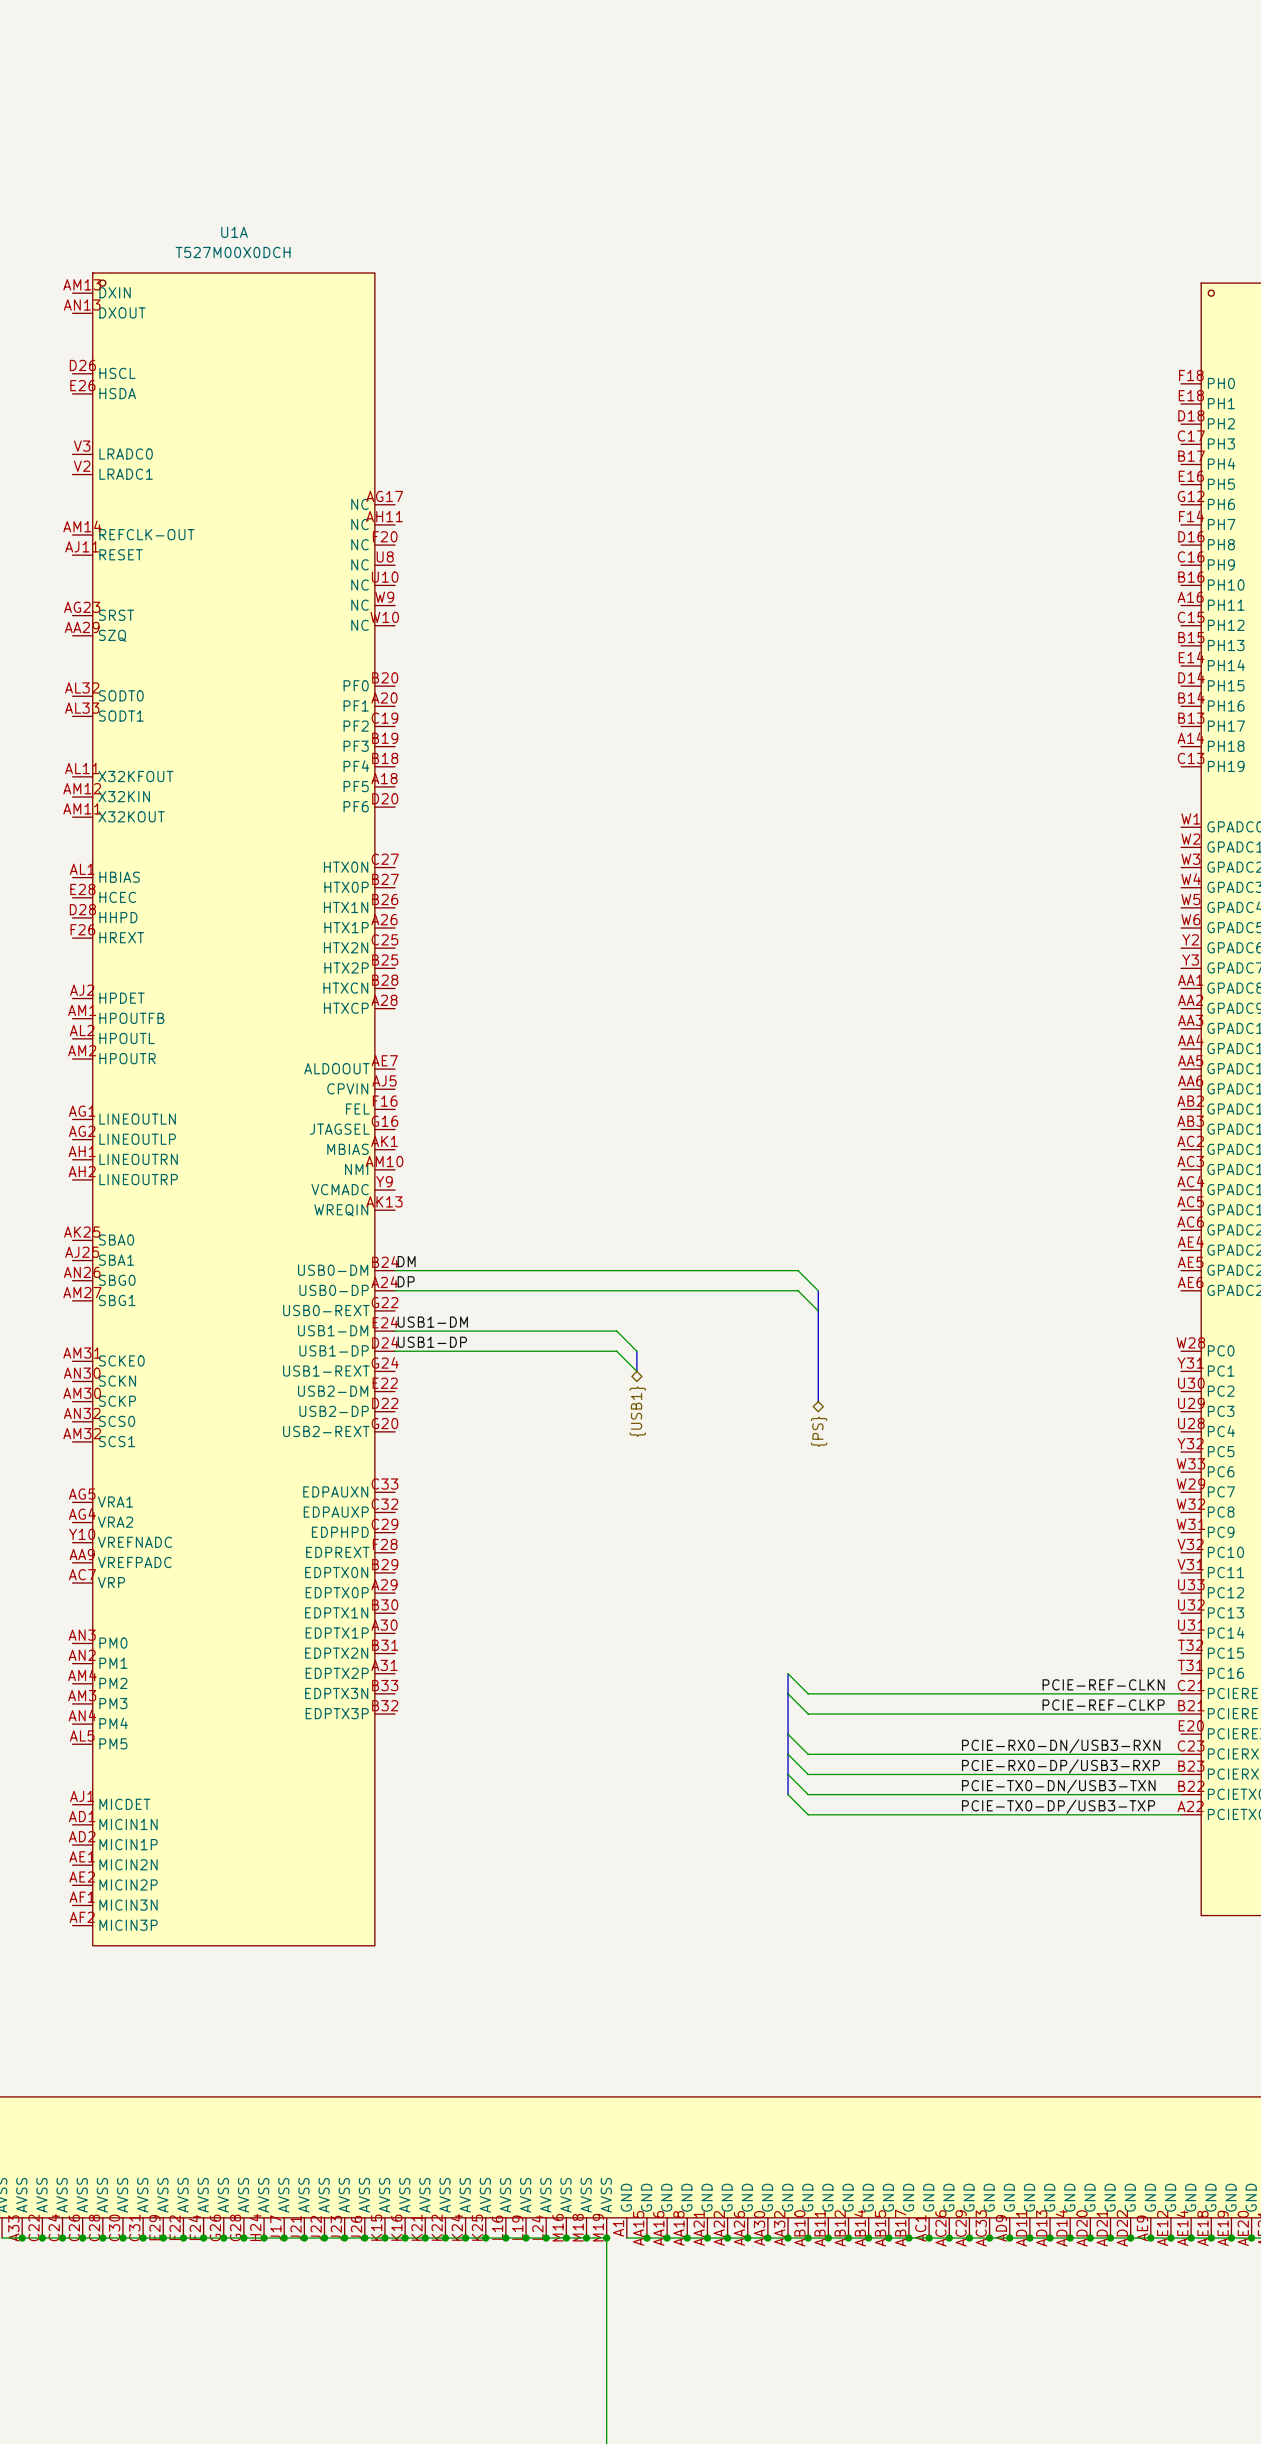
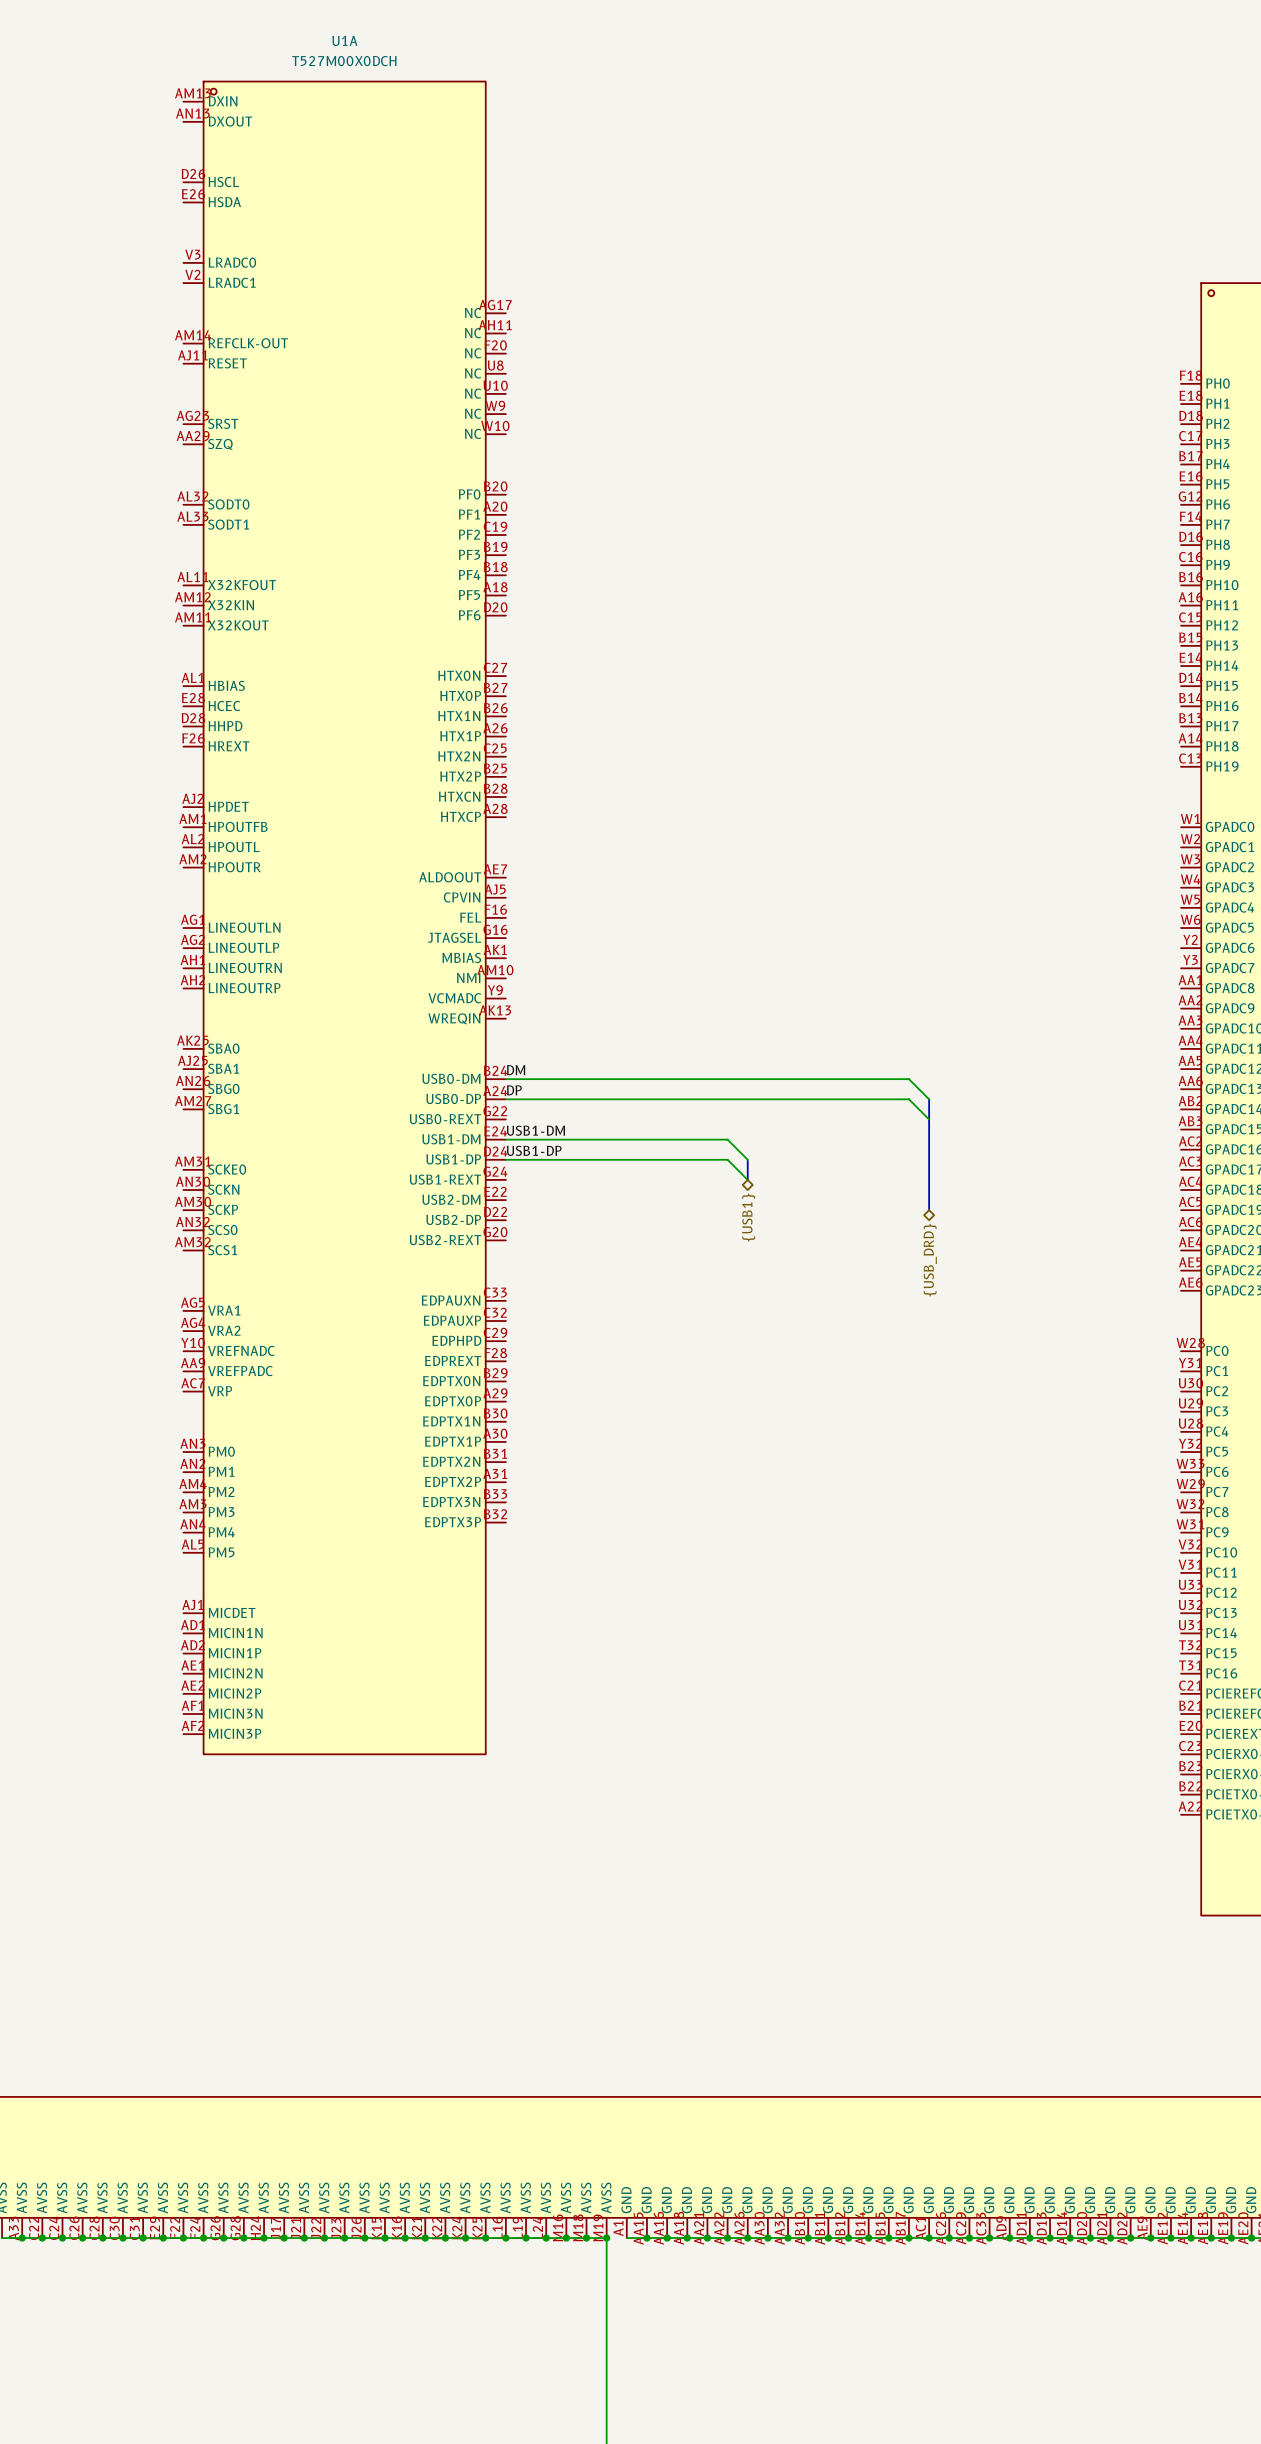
label: none -> DM (516, 1070)
wire: none -> (505, 1079) (908, 1079) (929, 1099)
label: none -> DP (514, 1090)
wire: none -> (505, 1099) (908, 1099) (929, 1119)
bus: none -> (929, 1099) (929, 1210)
U1A position: (233, 1109) -> (344, 917)
label: none -> USB1-DM (535, 1130)
wire: none -> (505, 1139) (727, 1139) (747, 1159)
label: none -> USB1-DP (534, 1150)
wire: none -> (505, 1159) (727, 1159) (747, 1179)
bus: none -> (747, 1159) (747, 1179)
hierarchical label: none -> {USB1} (748, 1217)
label: DM (406, 1261) -> none
hierarchical label: none -> {USB_DRD} (930, 1260)
wire: (395, 1270) (798, 1270) (818, 1290) -> none
label: DP (406, 1281) -> none
wire: (395, 1290) (798, 1290) (818, 1310) -> none
bus: (818, 1290) (818, 1401) -> none
label: USB1-DM (432, 1322) -> none
wire: (395, 1331) (616, 1331) (636, 1351) -> none
label: USB1-DP (432, 1342) -> none
wire: (395, 1351) (616, 1351) (636, 1371) -> none
bus: (636, 1351) (636, 1371) -> none
hierarchical label: {USB1} (637, 1411) -> none
hierarchical label: {PS} (819, 1431) -> none
wire: (788, 1673) (808, 1693) (1181, 1693) -> none
bus: (788, 1673) (788, 1794) -> none
label: PCIE-REF-CLKN (1103, 1684) -> none
wire: (788, 1693) (808, 1714) (1181, 1714) -> none
label: PCIE-REF-CLKP (1103, 1705) -> none
wire: (788, 1734) (808, 1754) (1181, 1754) -> none
label: PCIE-RX0-DN/USB3-RXN (1061, 1746) -> none
wire: (788, 1754) (808, 1774) (1181, 1774) -> none
label: PCIE-RX0-DP/USB3-RXP (1060, 1766) -> none
wire: (788, 1774) (808, 1794) (1181, 1794) -> none
label: PCIE-TX0-DN/USB3-TXN (1058, 1786) -> none
wire: (788, 1794) (808, 1814) (1181, 1814) -> none
label: PCIE-TX0-DP/USB3-TXP (1058, 1806) -> none

